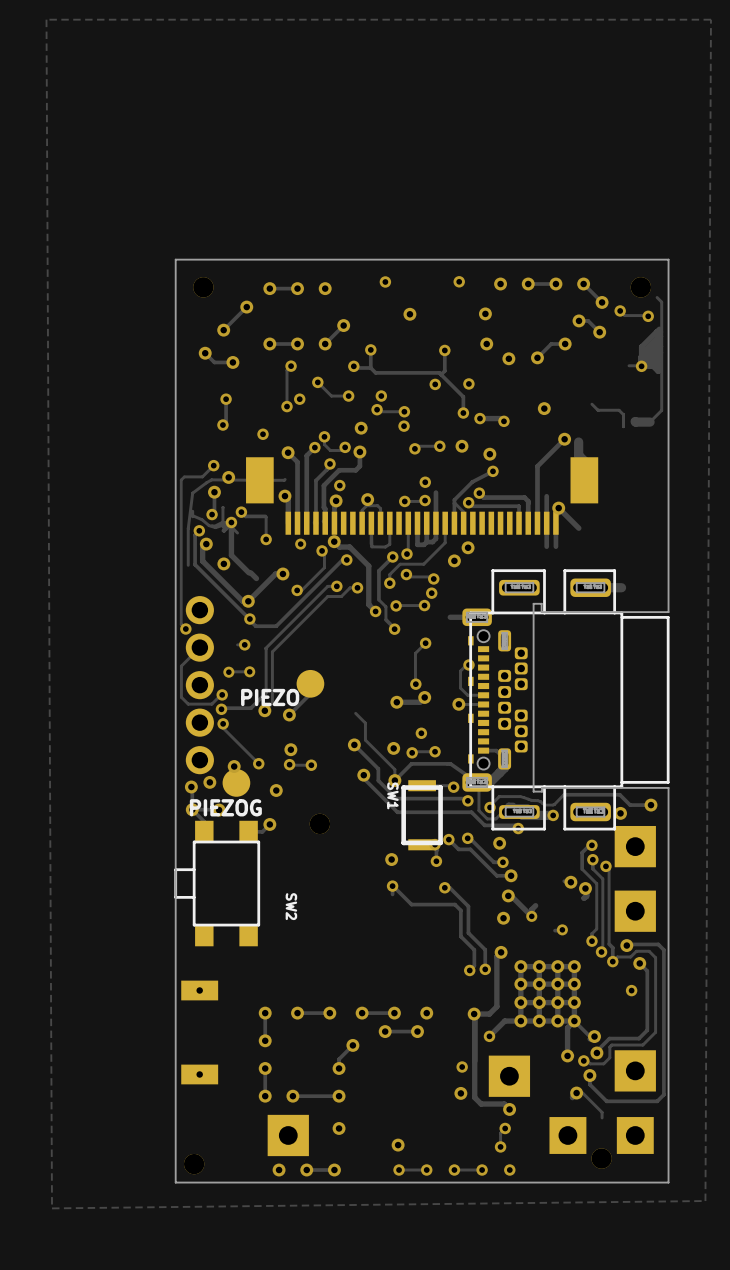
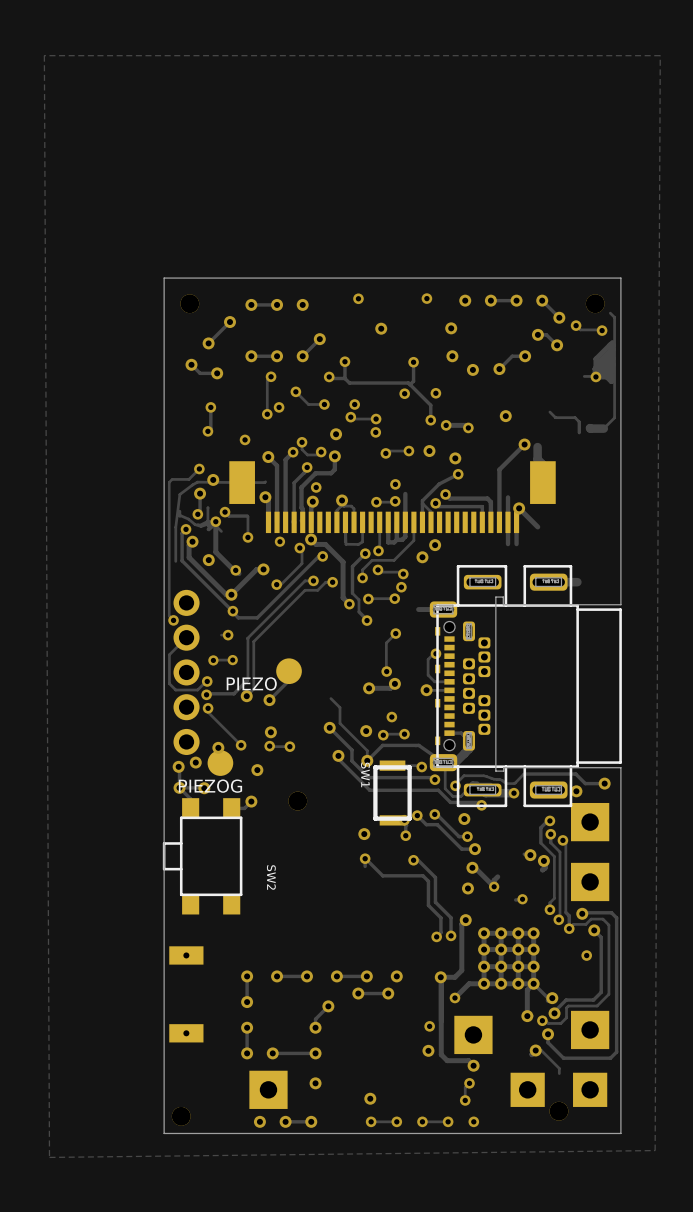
via: none -> (235, 570)

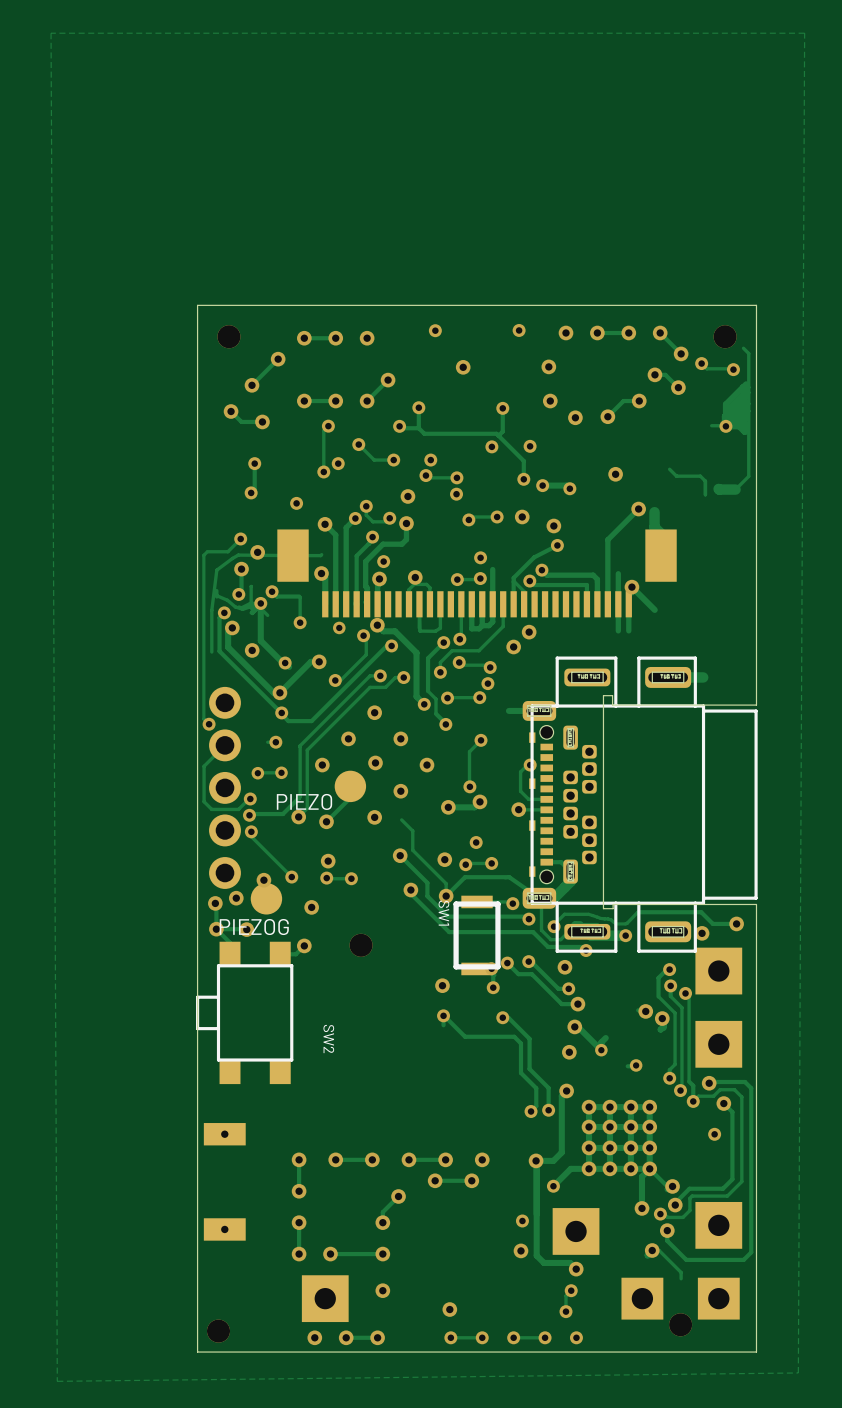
via: none -> (374, 712)
via: none -> (348, 738)
via: none -> (400, 738)
via: none -> (375, 762)
via: none -> (322, 765)
via: none -> (427, 765)
via: none -> (400, 791)
via: none -> (374, 817)

